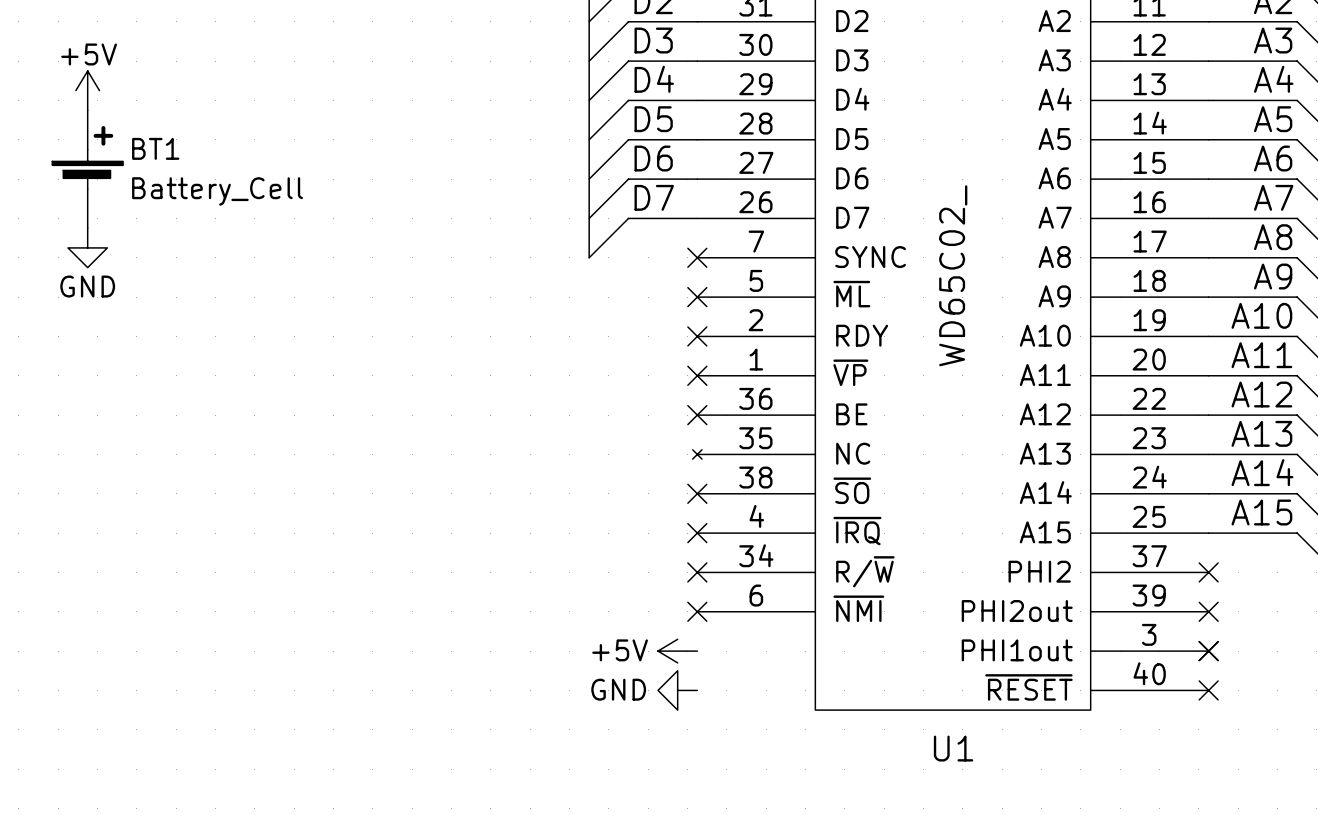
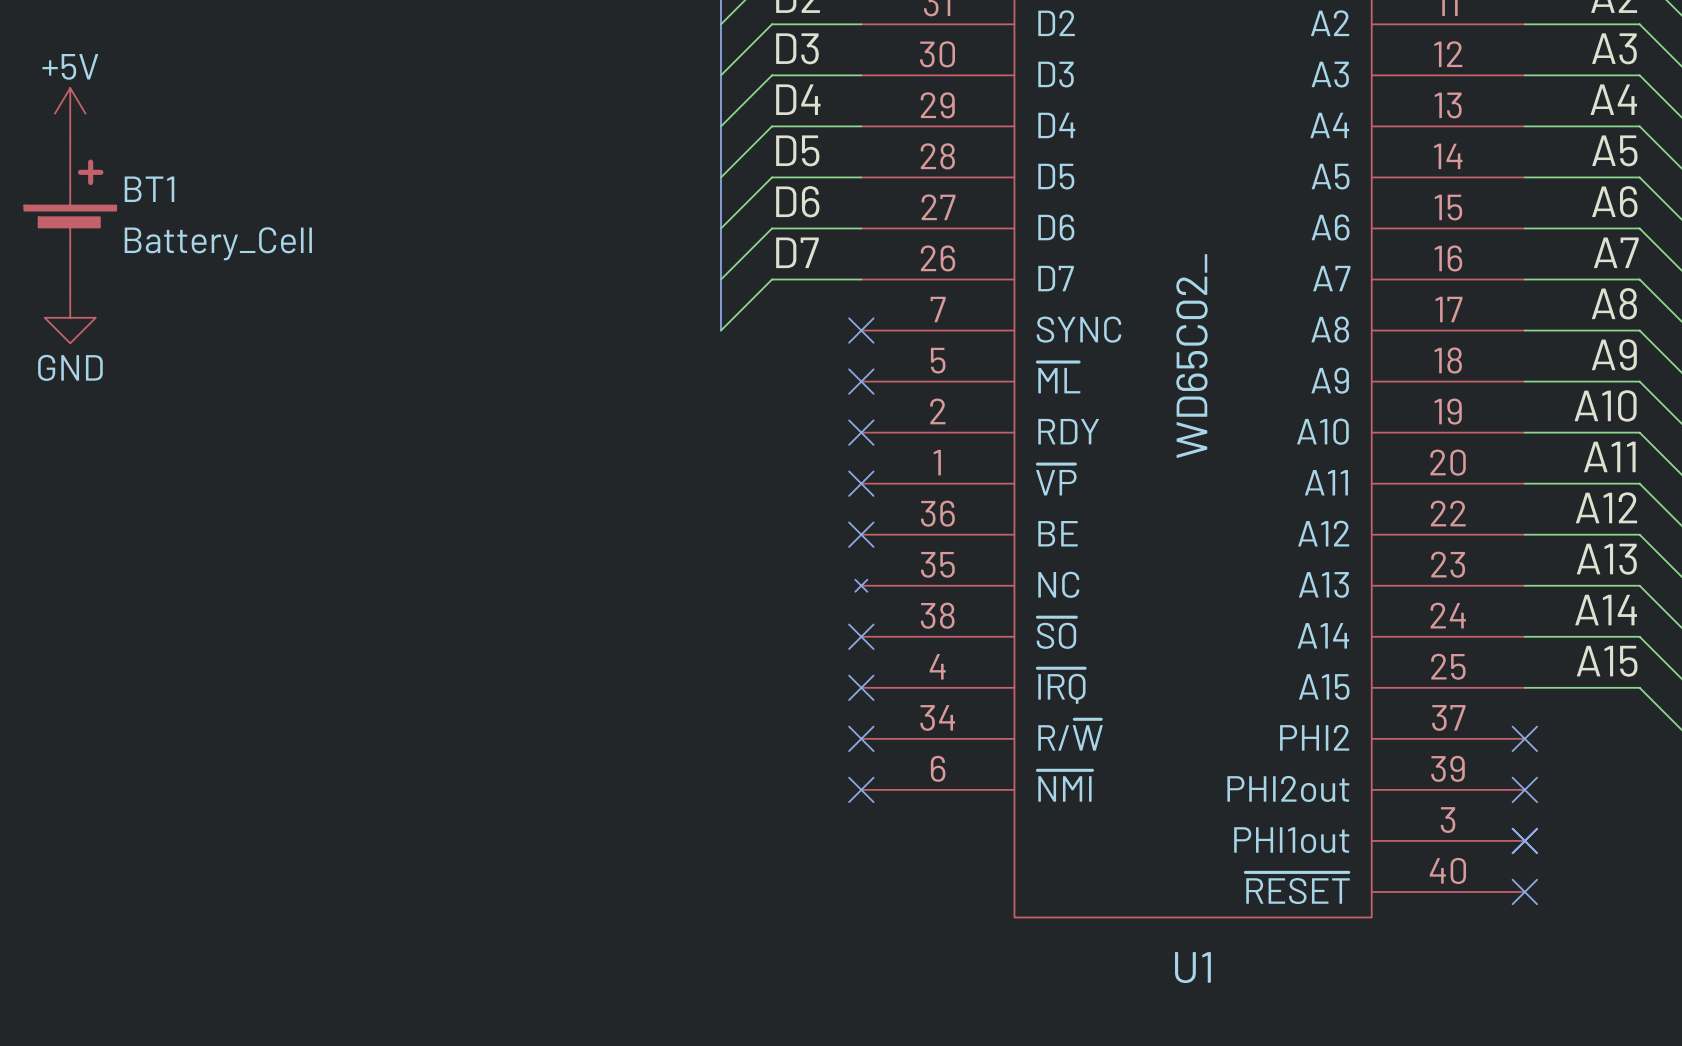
power symbol: +5V (677, 651) -> none
power symbol: GND (677, 690) -> none

